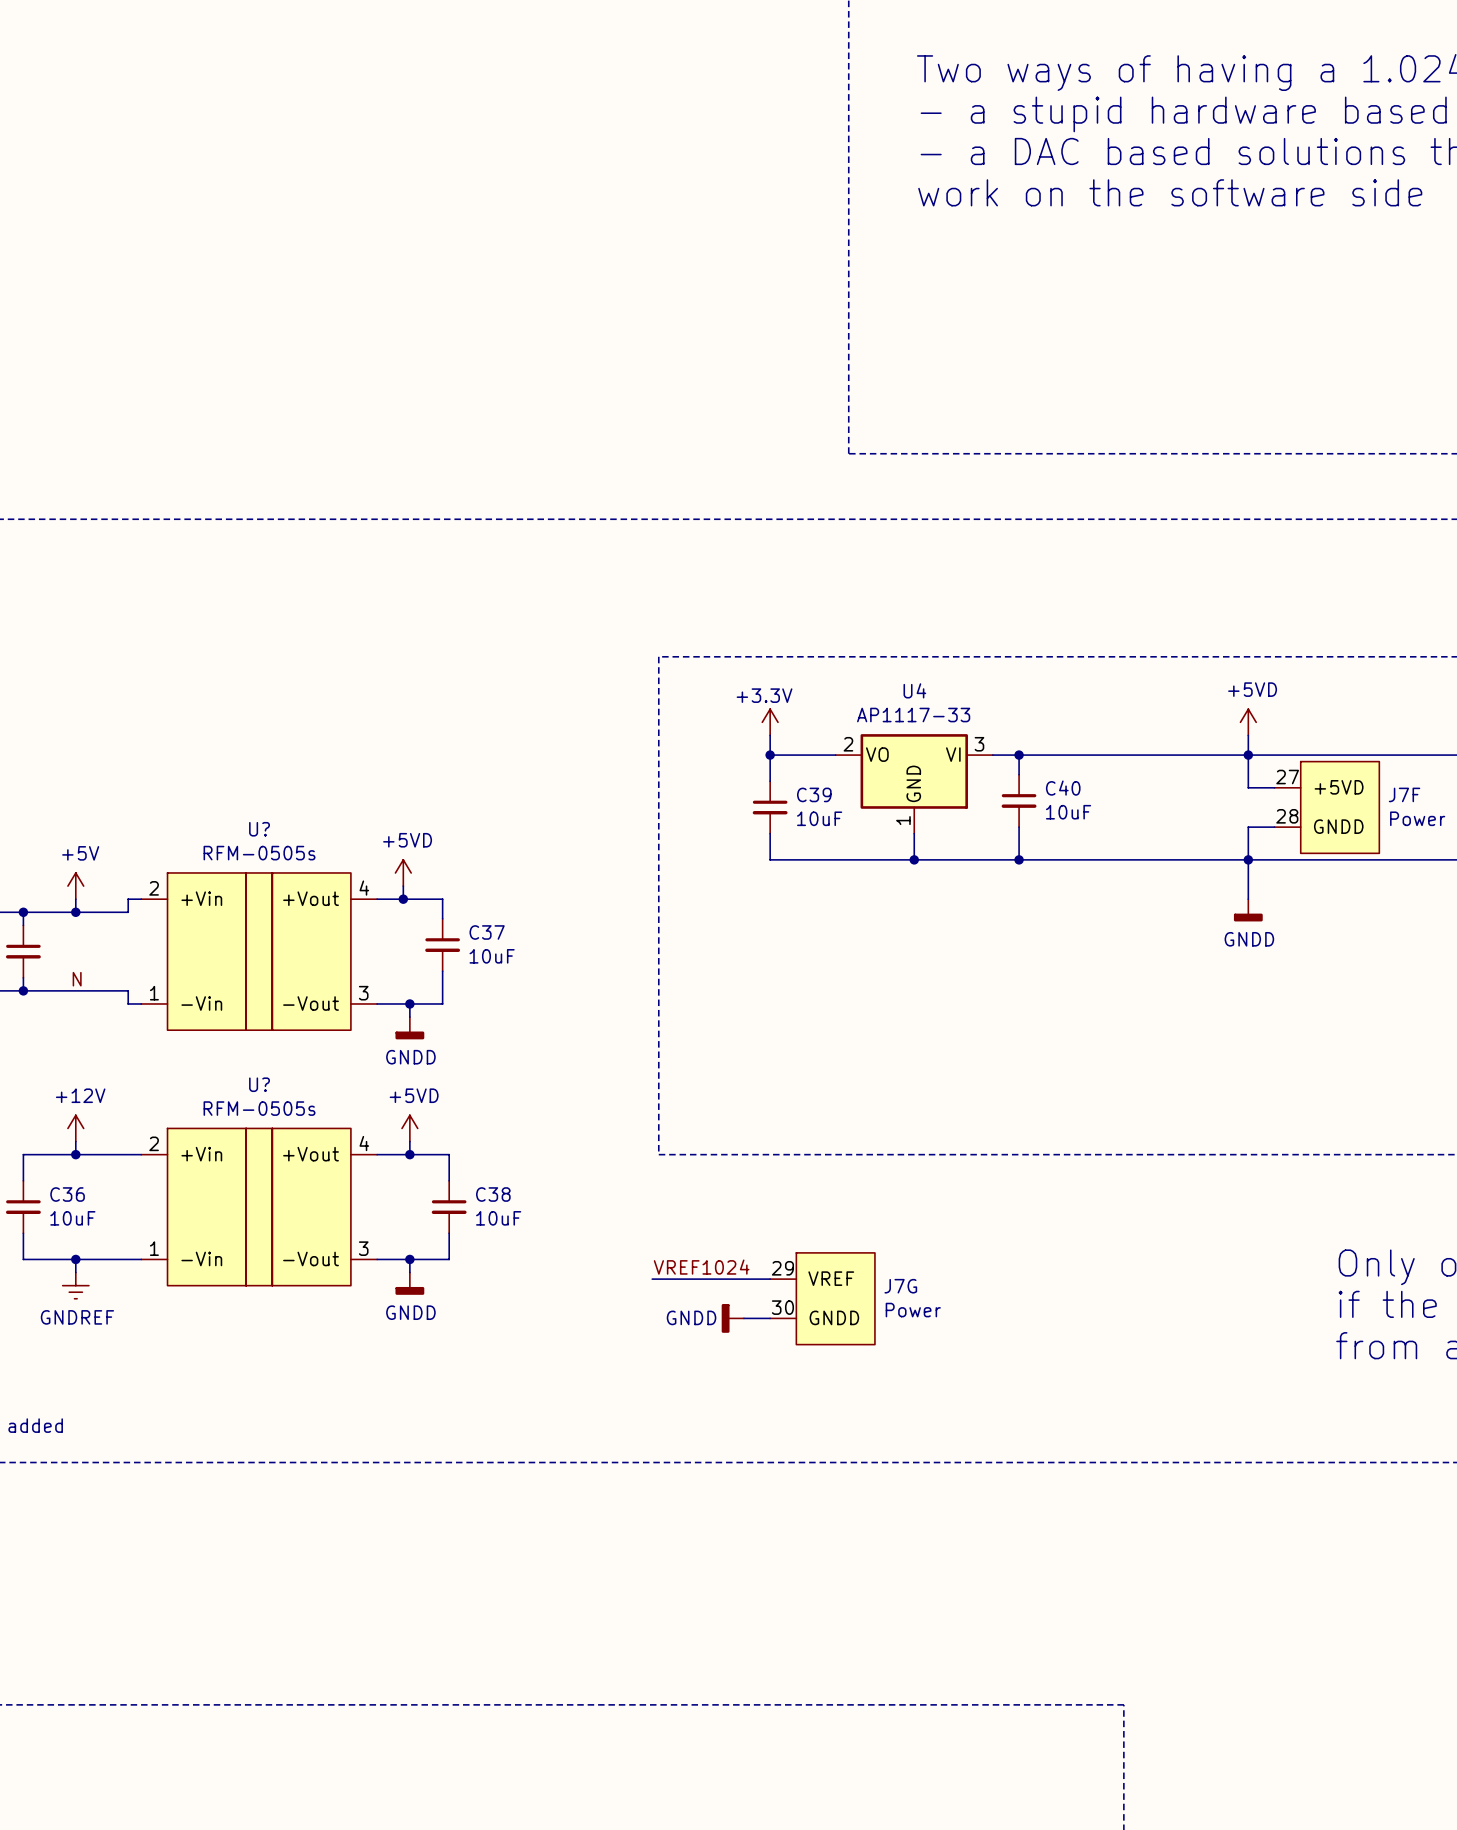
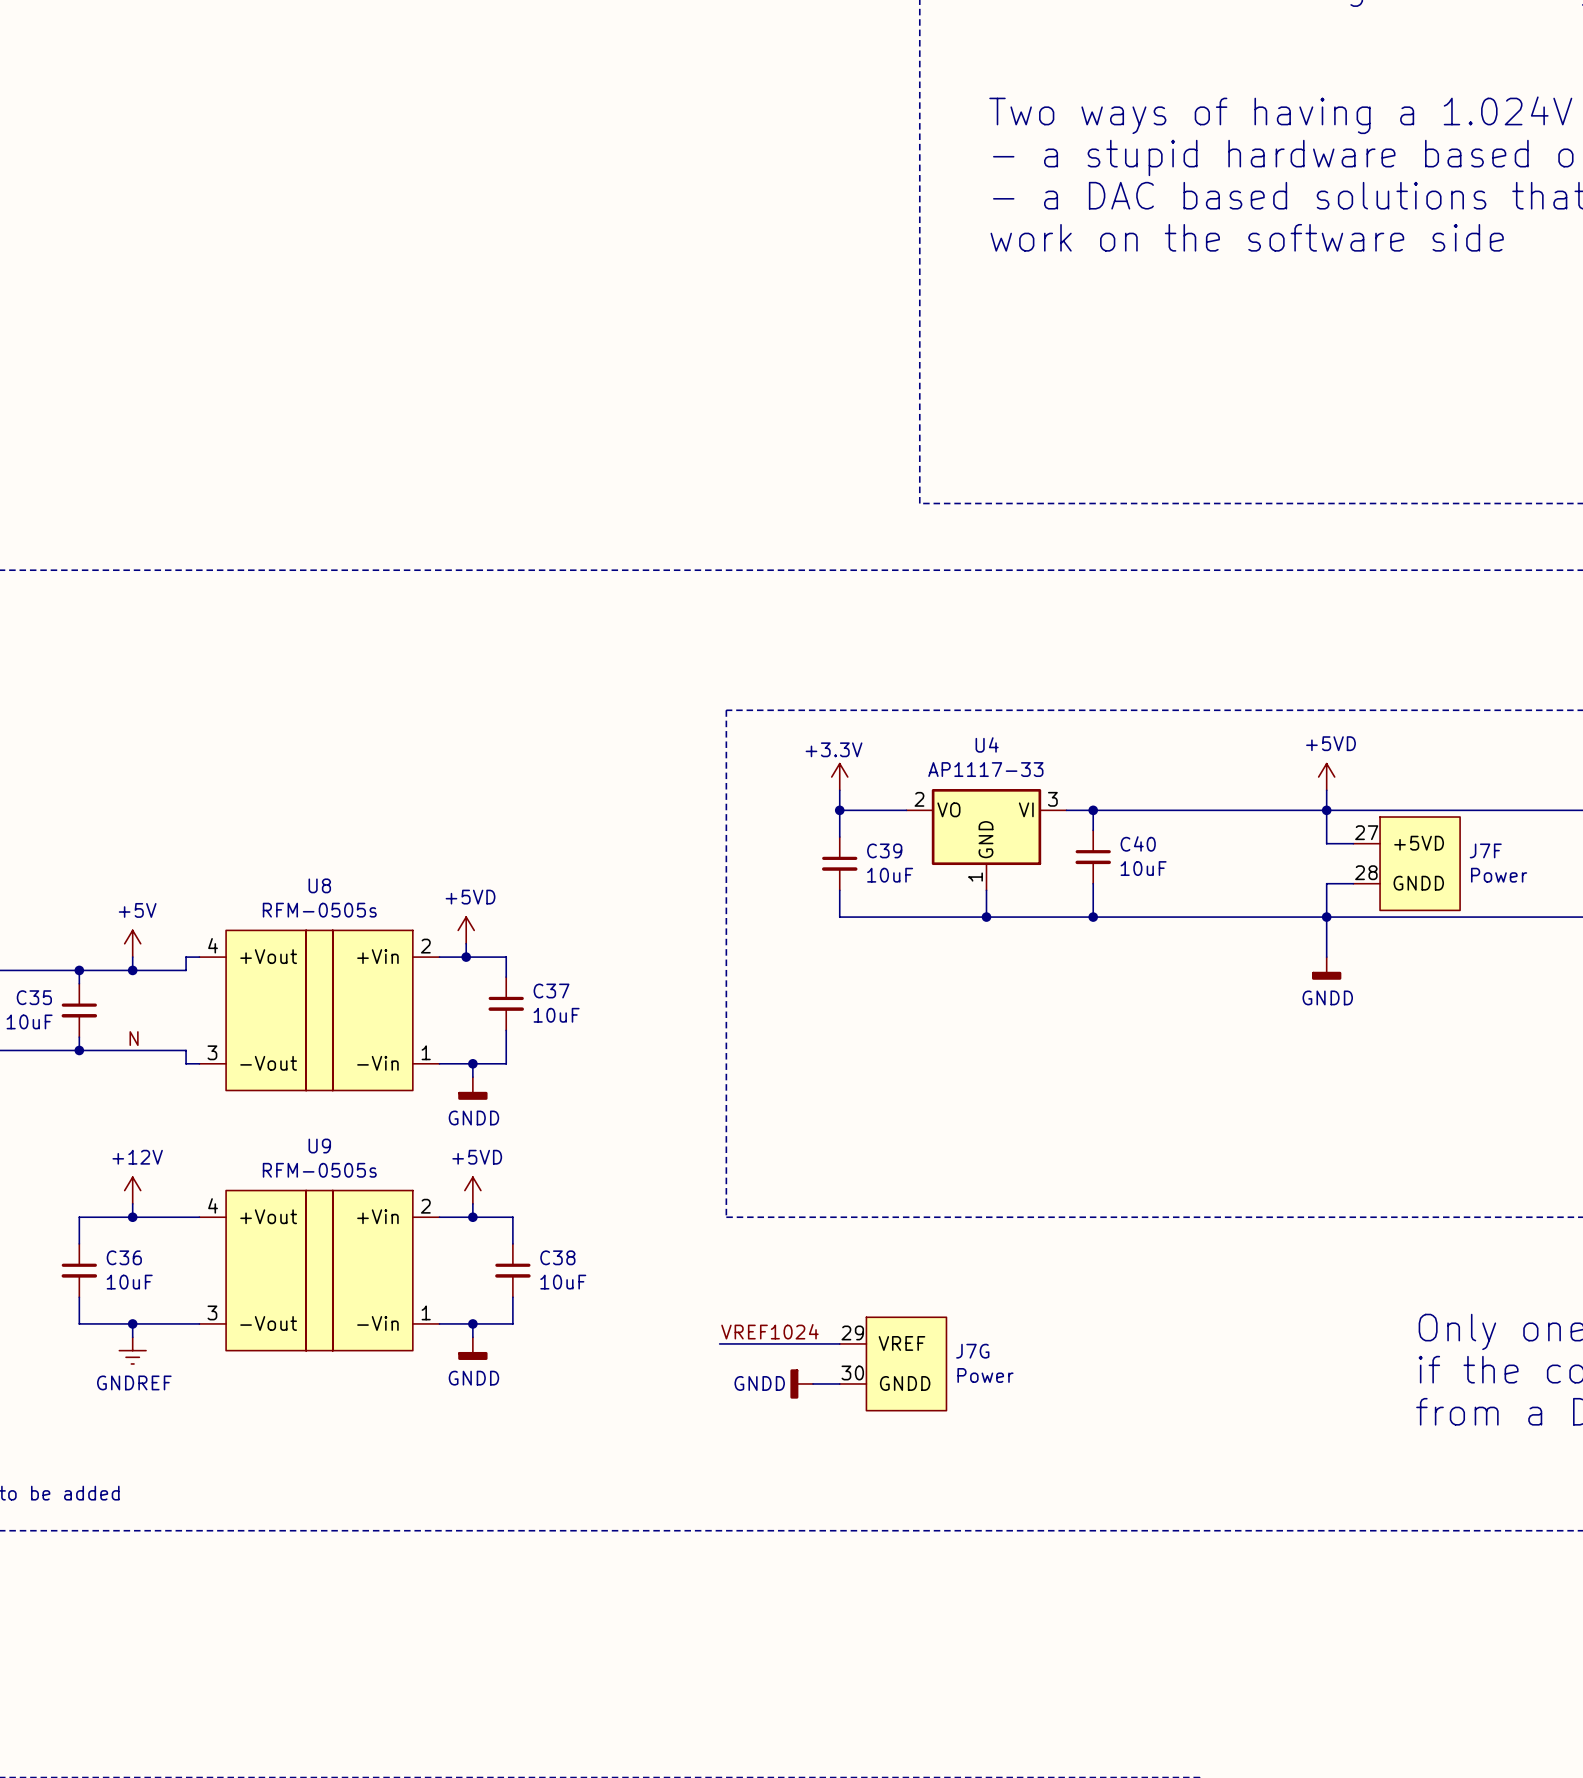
U? name: U? (259, 829) -> U8 (319, 885)
U? flip: as is (259, 951) -> left-right (319, 1010)
U? name: U? (259, 1084) -> U9 (319, 1146)
U? flip: as is (259, 1207) -> left-right (319, 1270)

